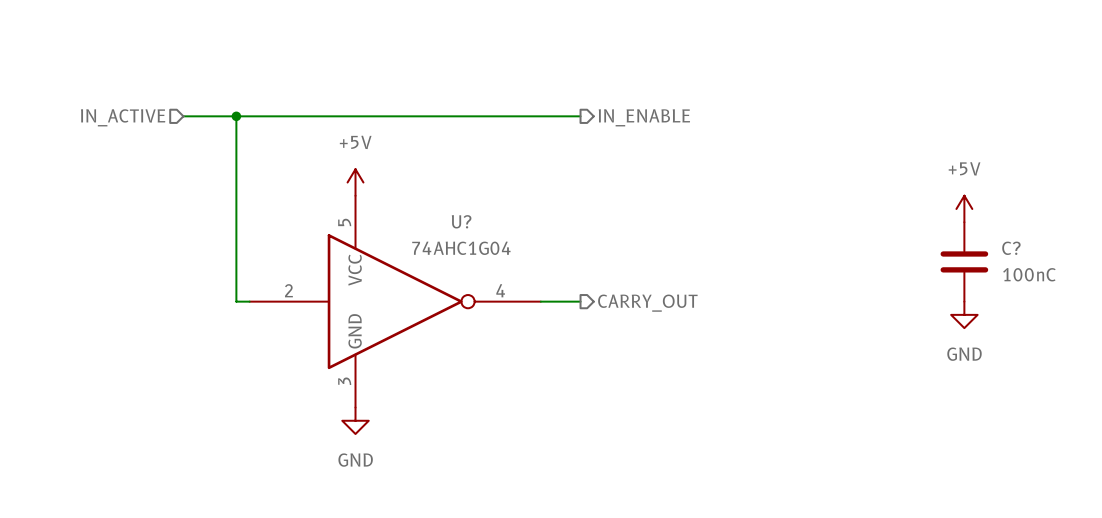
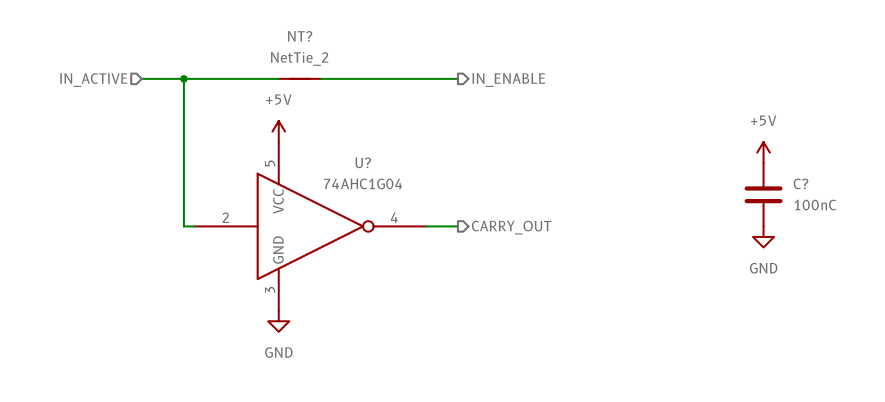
NT?: none -> NetTie_2 (299, 78)

